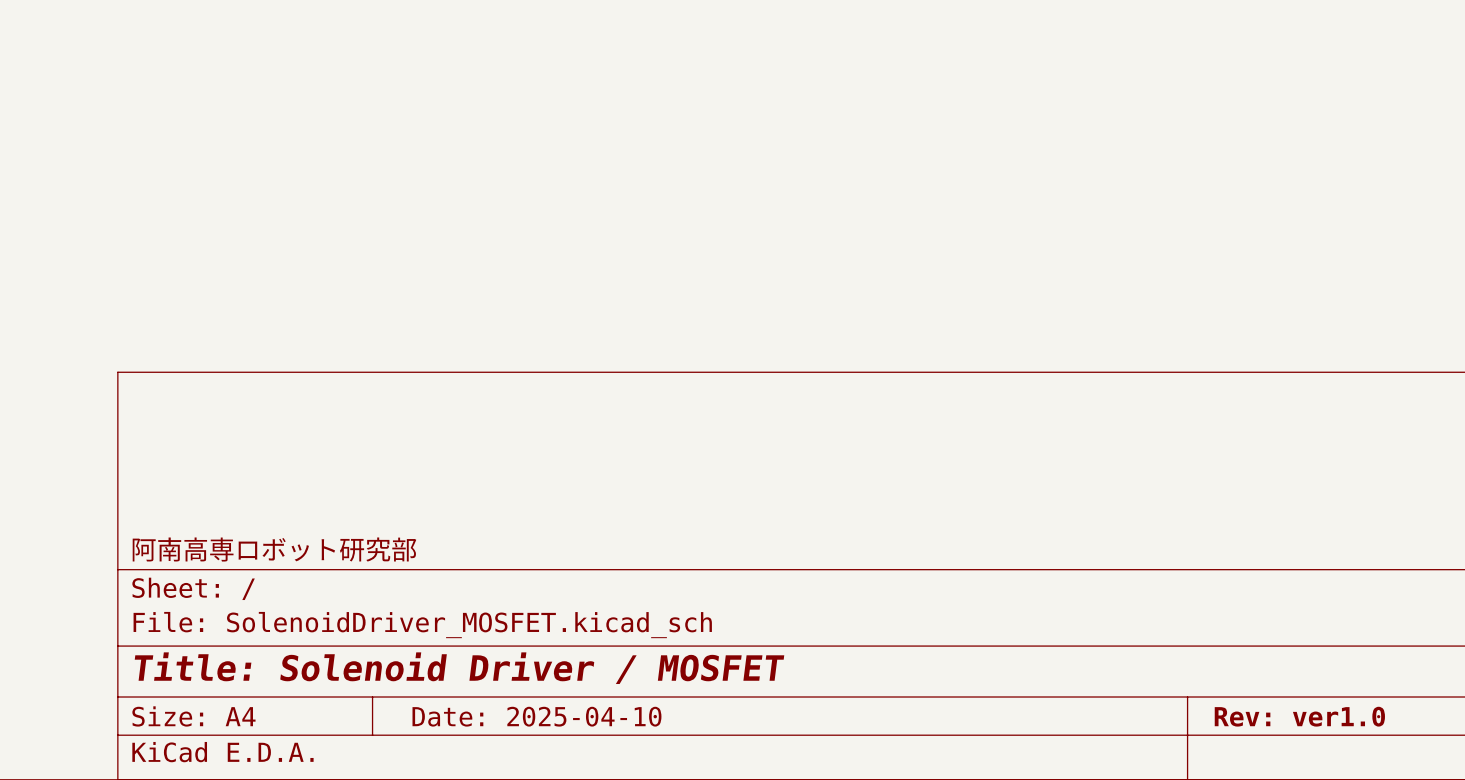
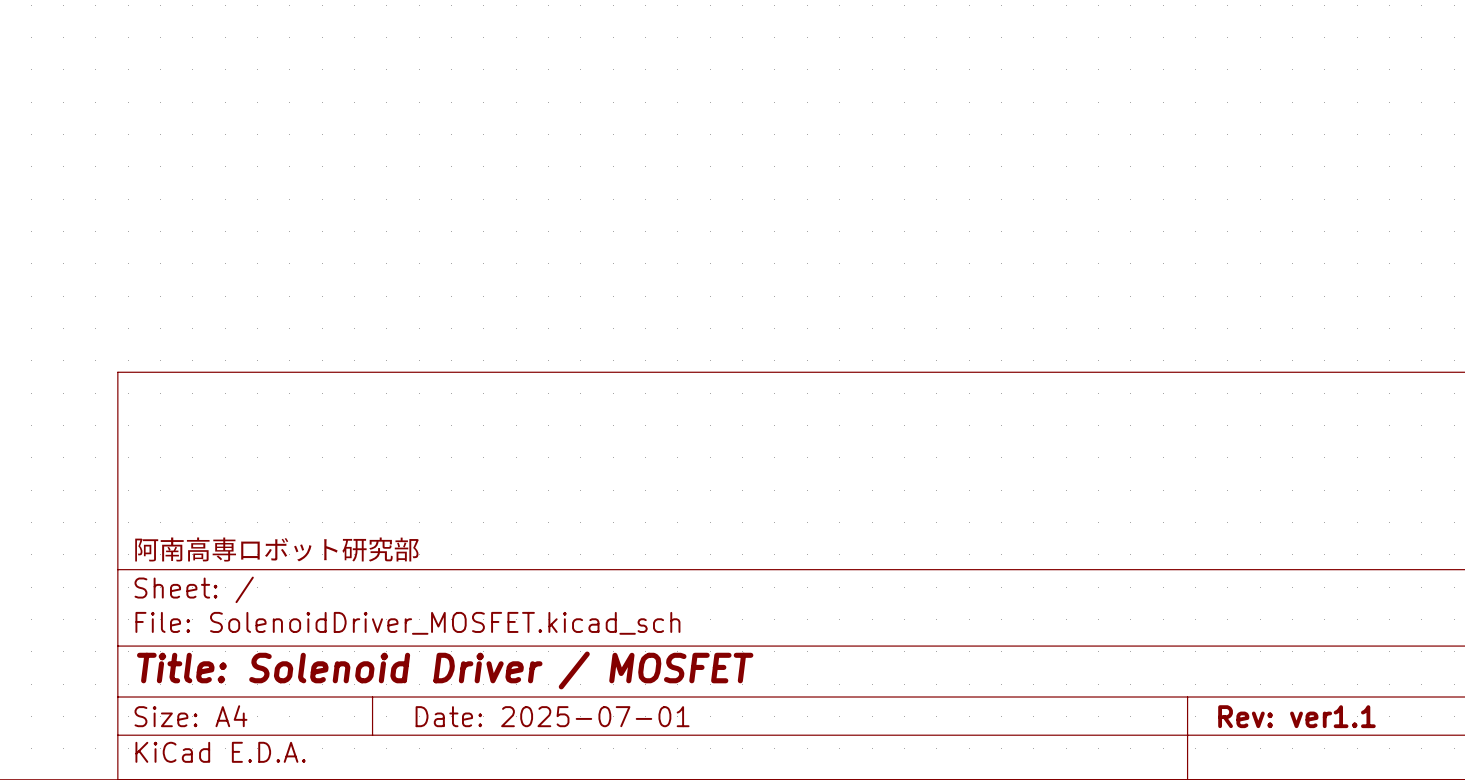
title block: Date: 2025-04-10 (536, 716) -> Date: 2025-07-01 (552, 716)
title block: Rev: ver1.0 (1299, 716) -> Rev: ver1.1 (1296, 716)

